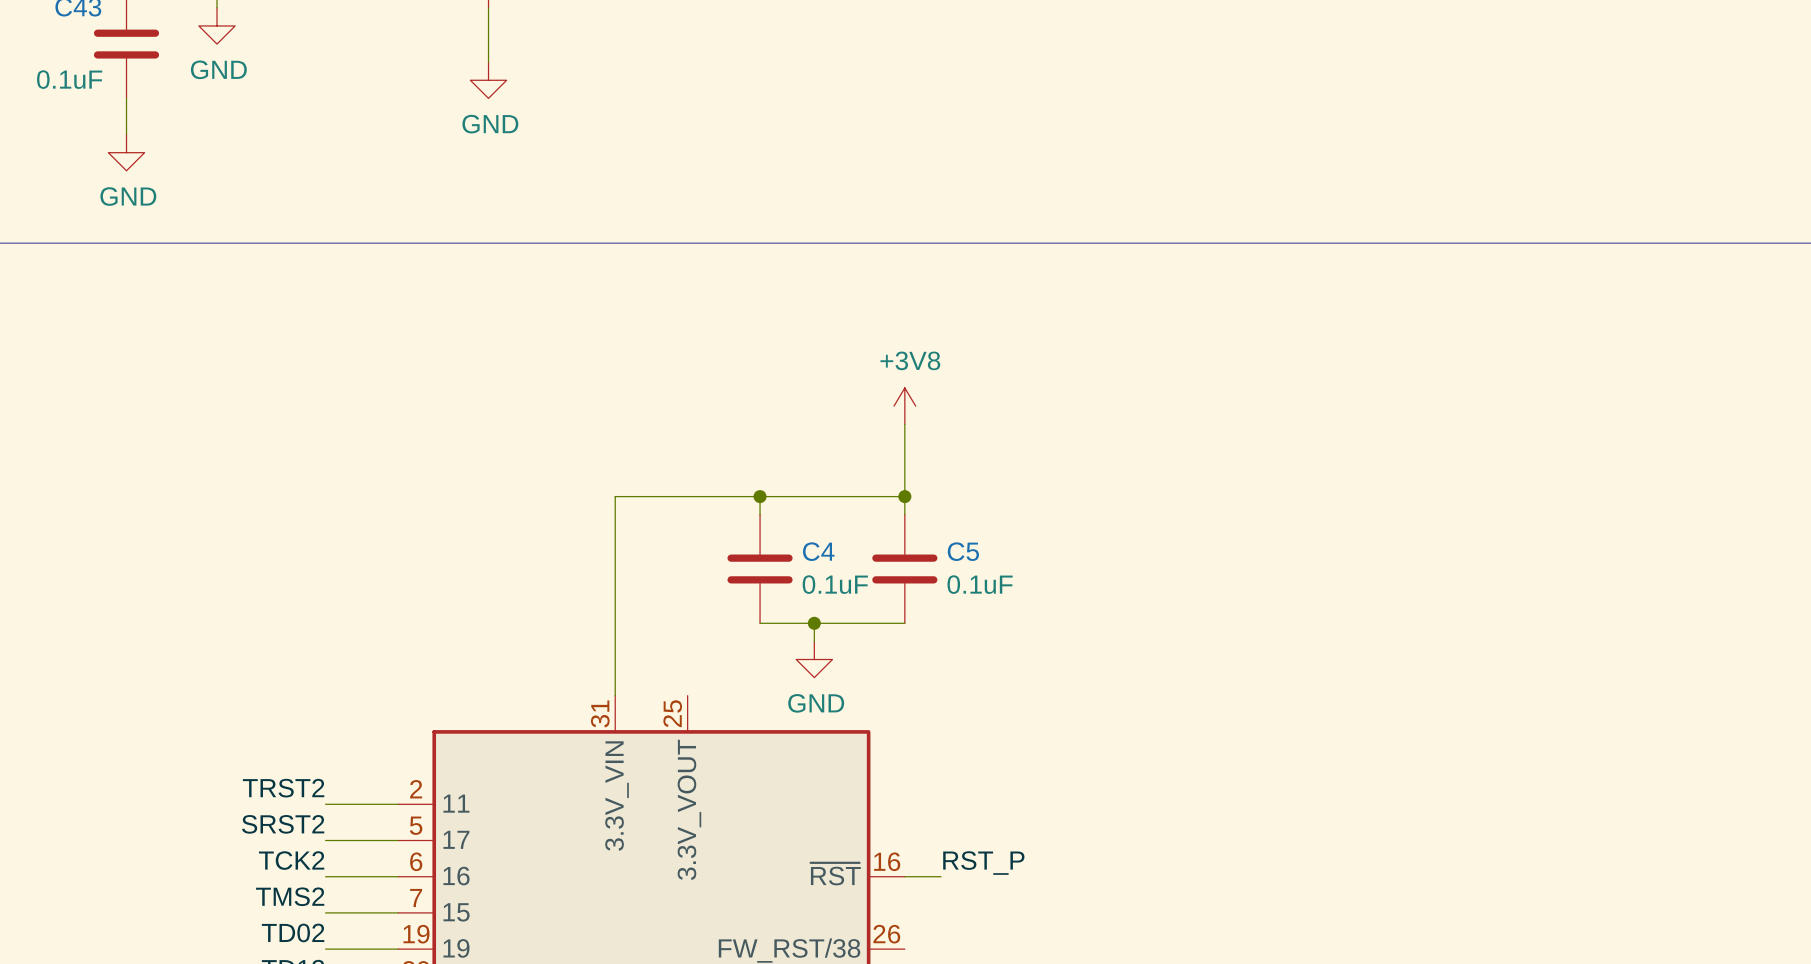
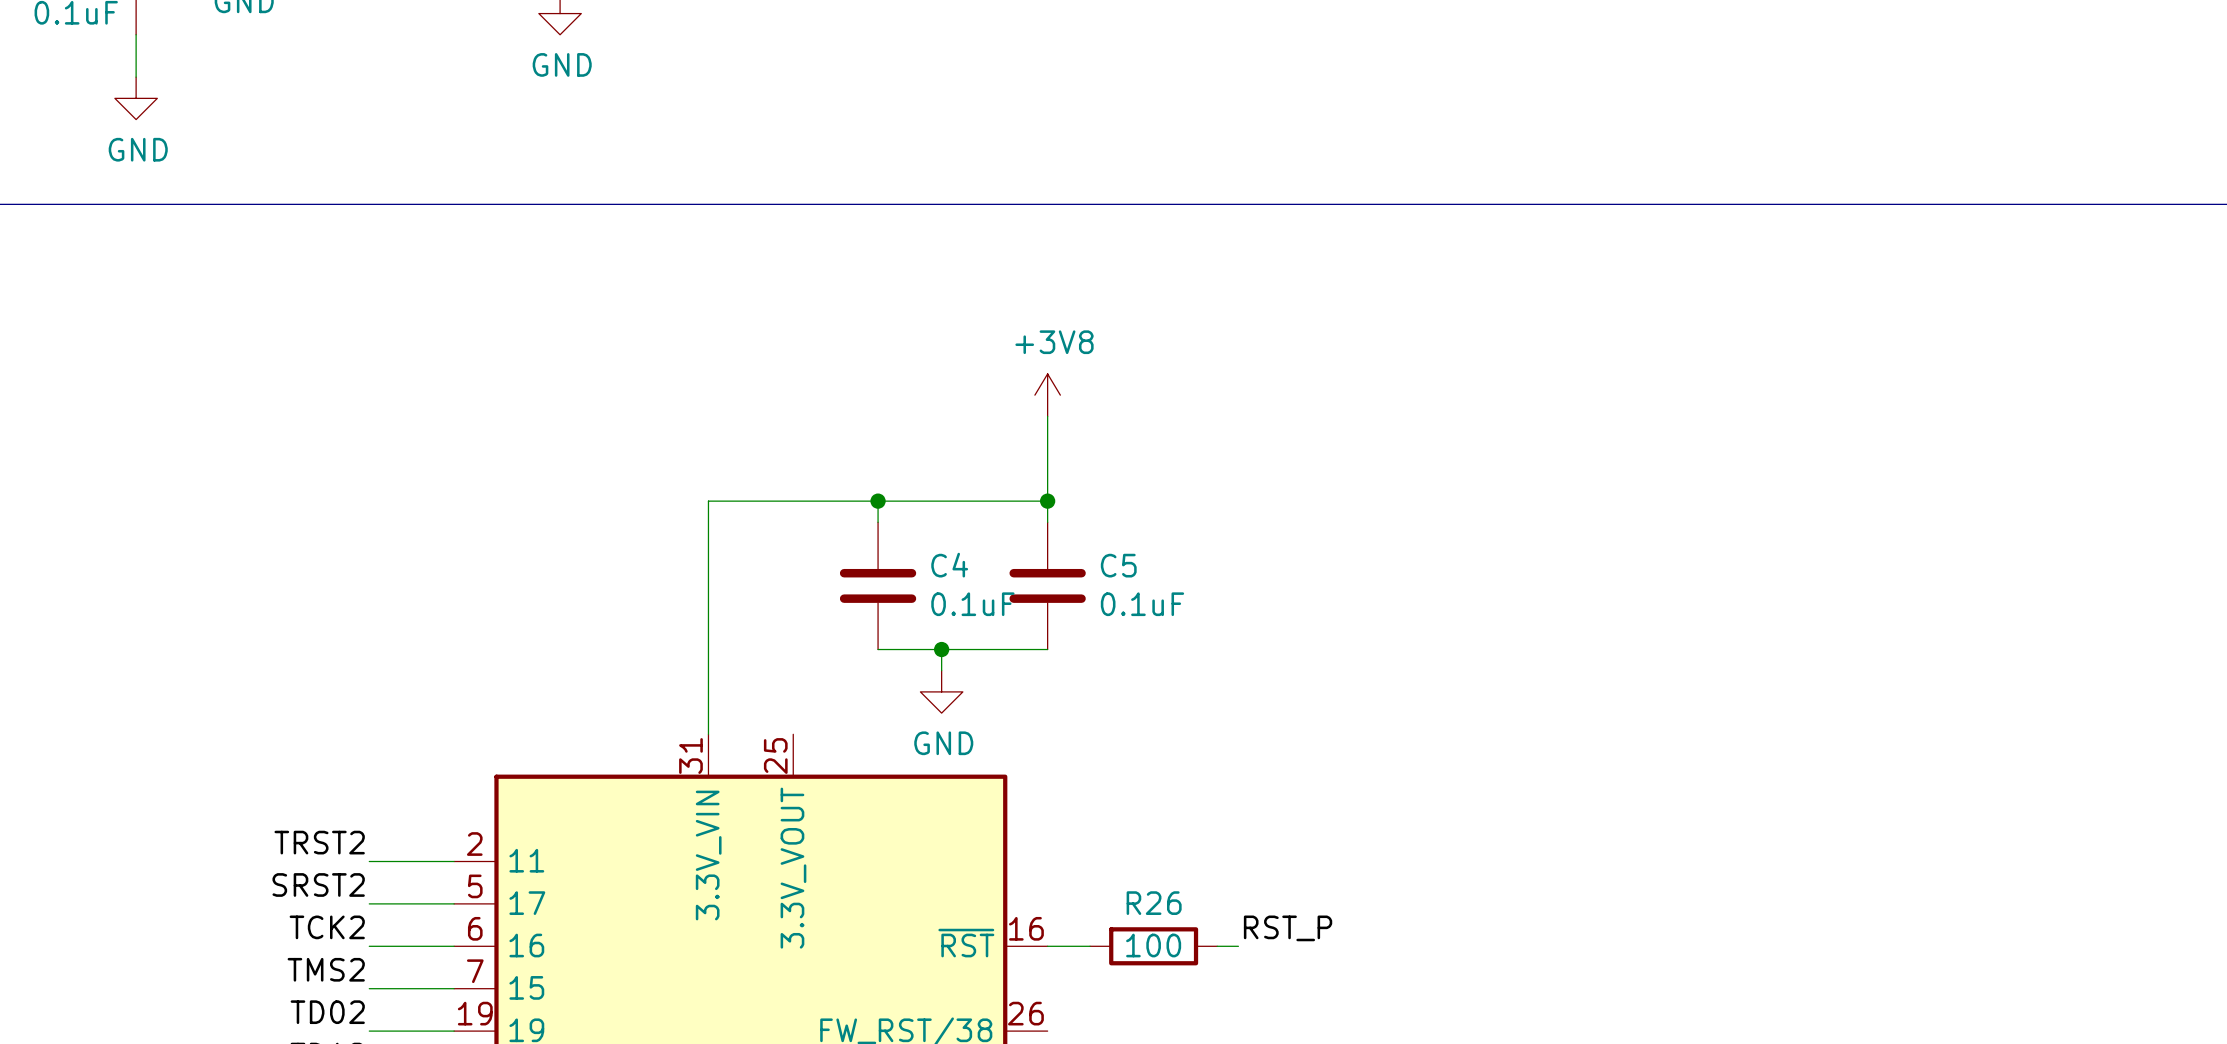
label position: RST_P (983, 863) -> RST_P (1288, 928)
R26: none -> 100 (1153, 946)
wire: none -> (1217, 946) (1238, 946)

